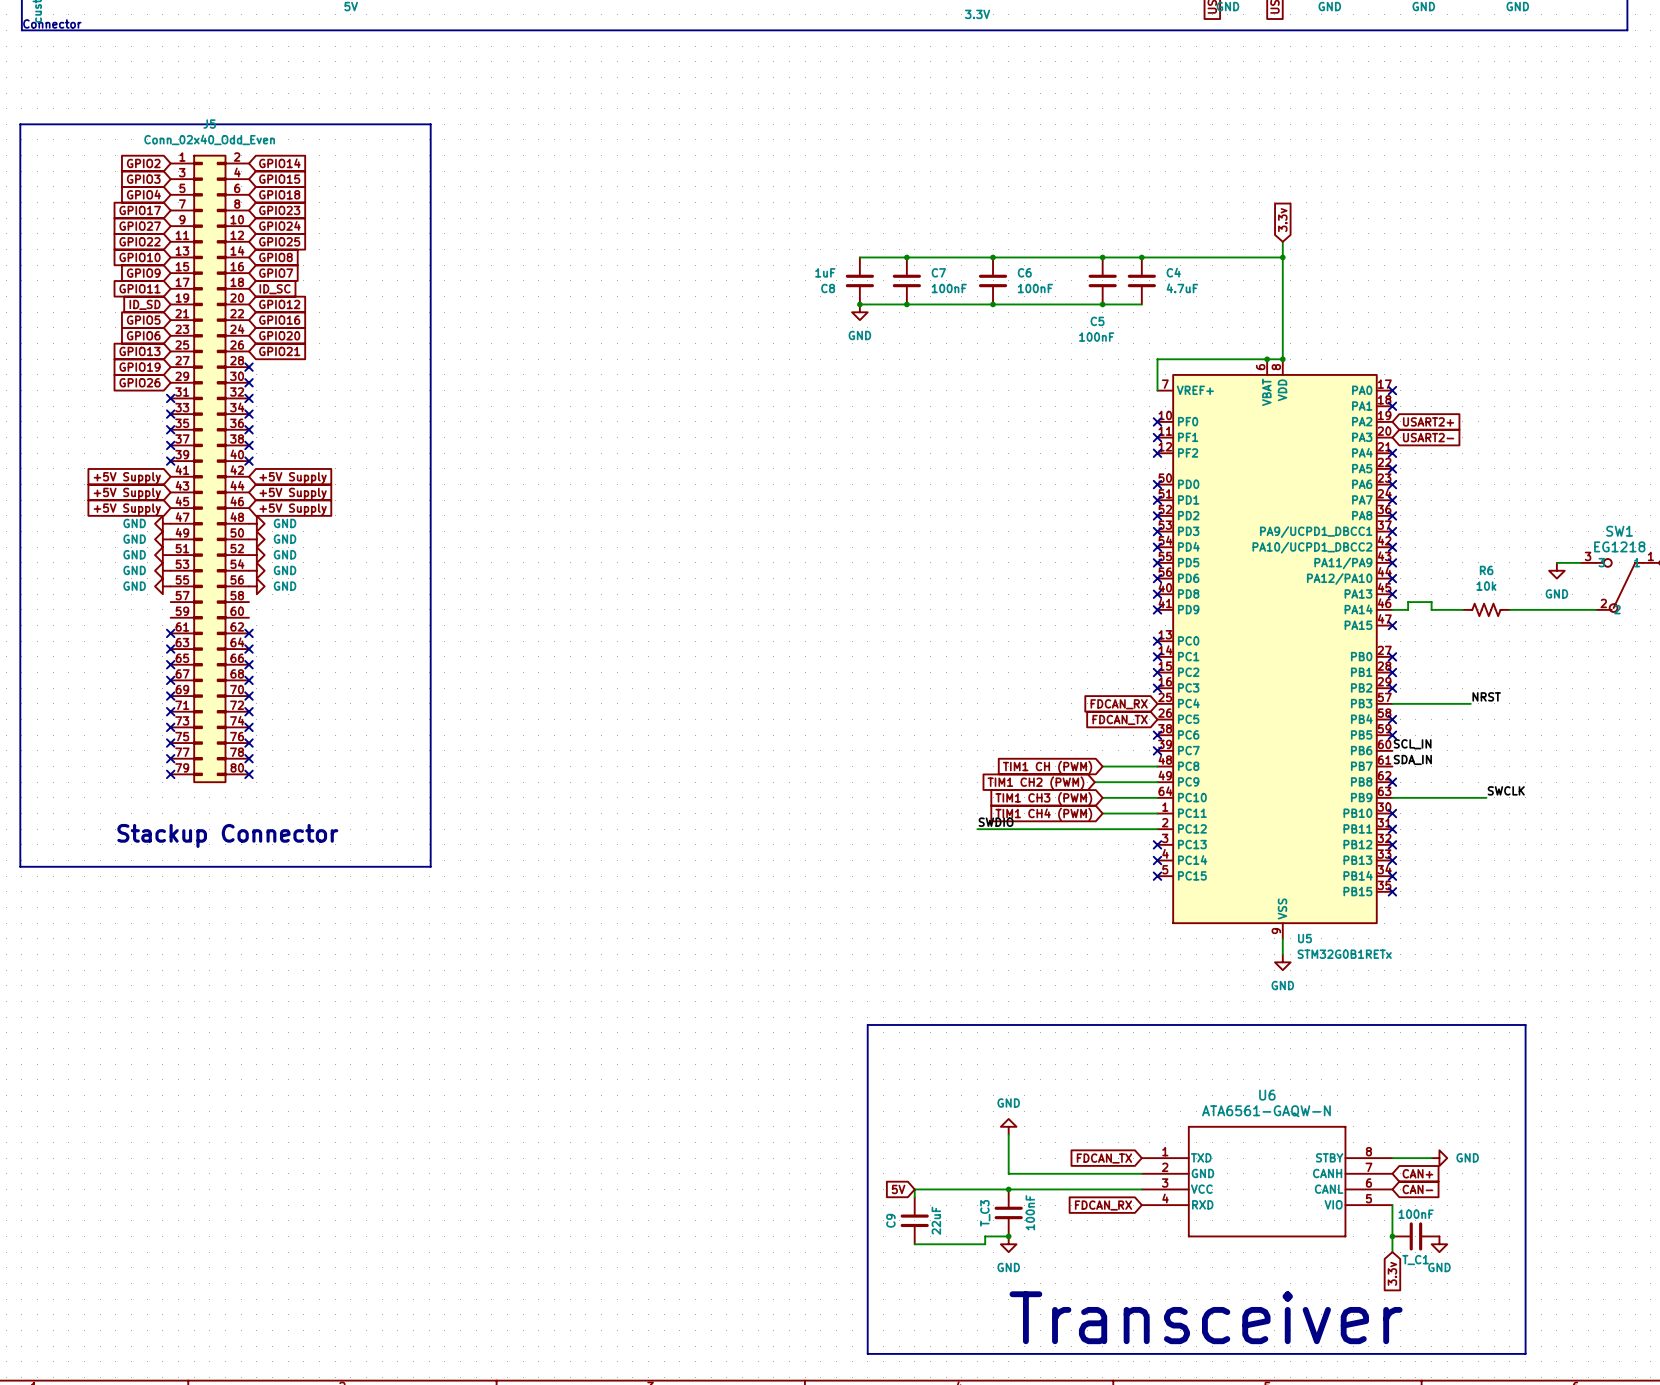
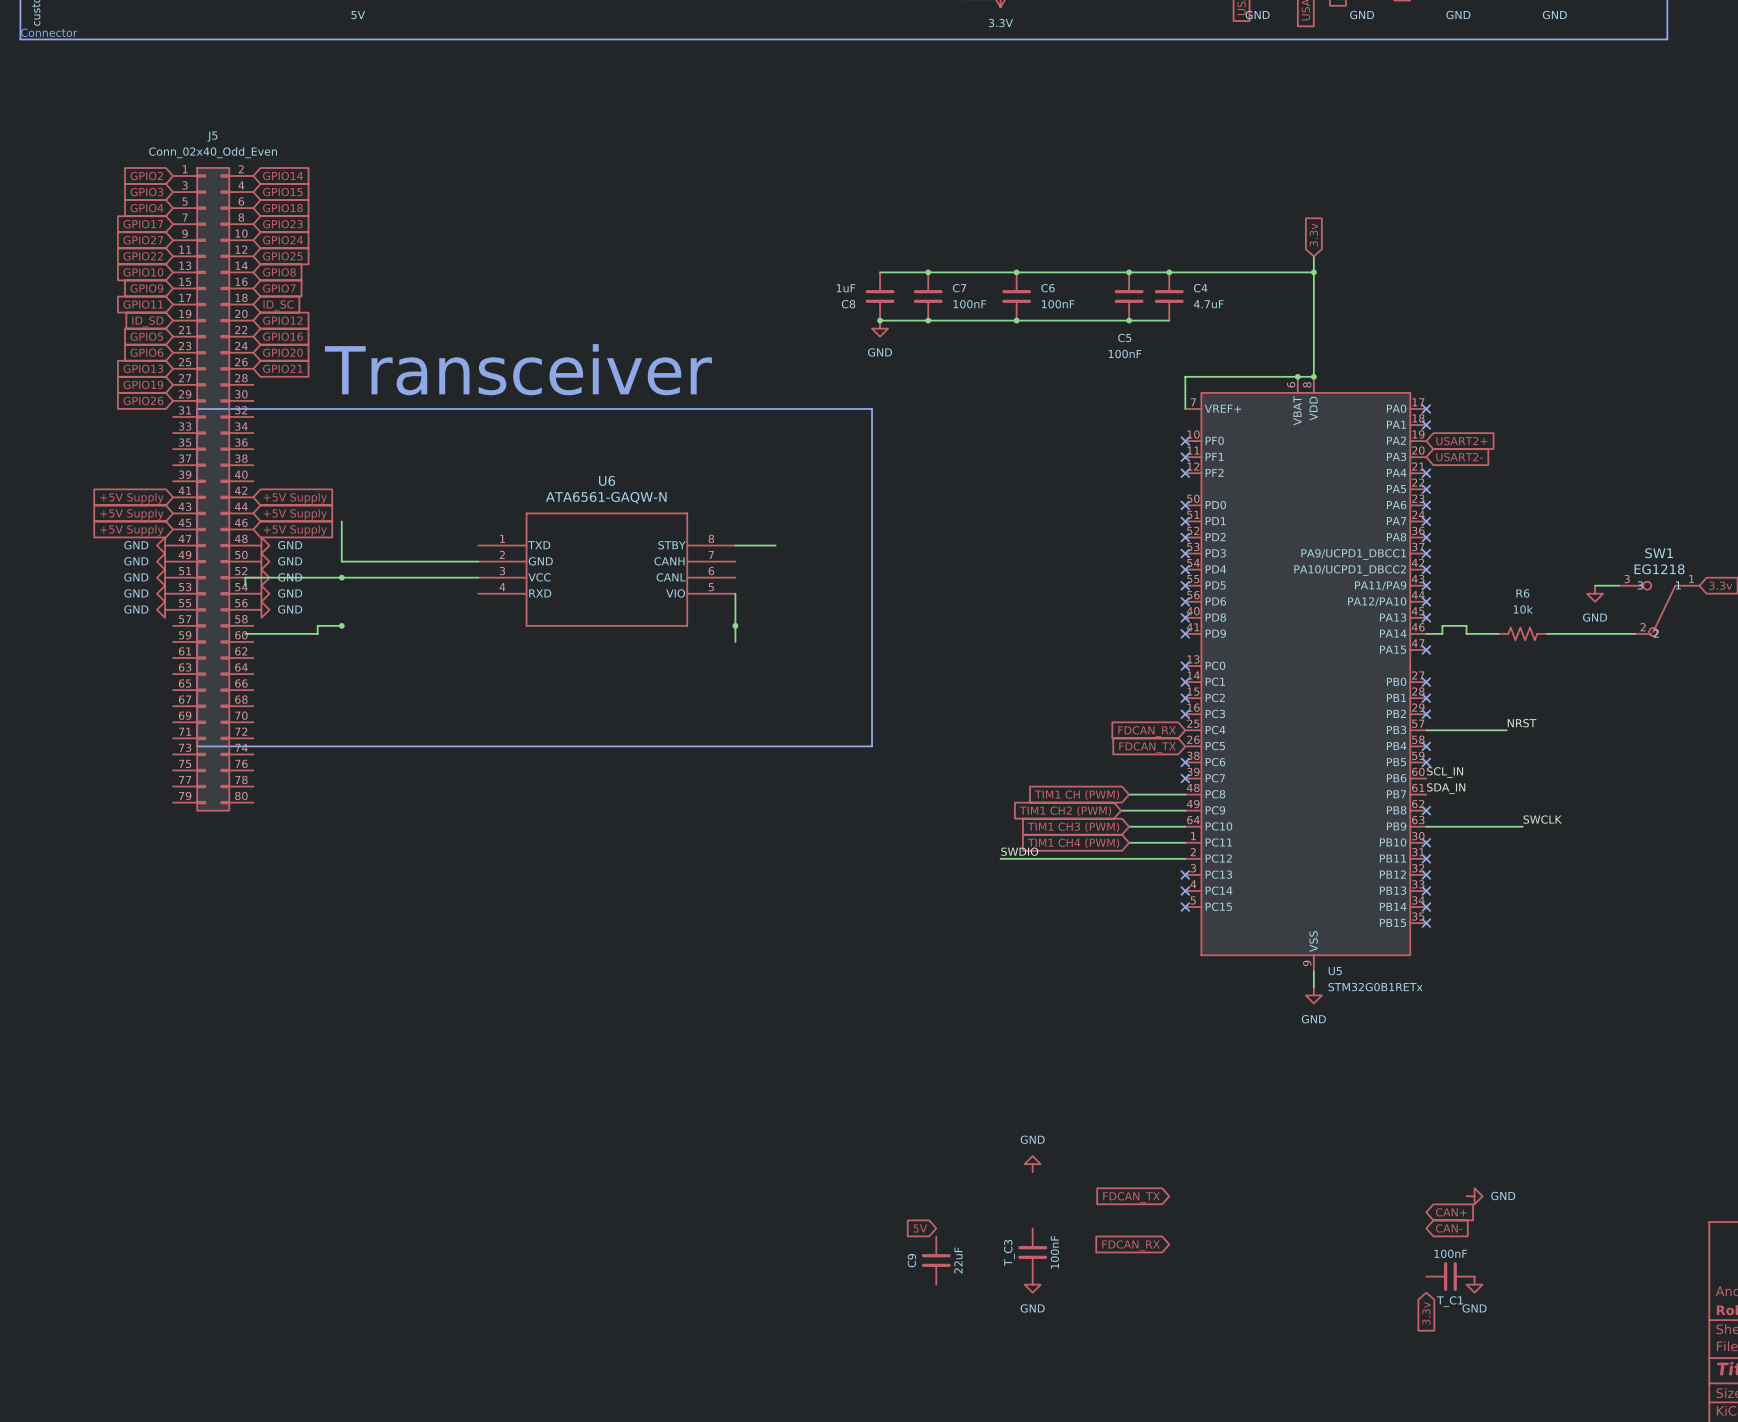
line: (20, 124) (430, 124) (430, 866) (20, 866) (20, 124) -> none
text: none -> Transceiver (518, 369)
no-connect mark: (249, 367) -> none
no-connect mark: (249, 382) -> none
line: none -> (197, 408) (872, 408) (872, 746) (197, 746) (197, 408)
no-connect mark: (170, 398) -> none
no-connect mark: (249, 398) -> none
no-connect mark: (170, 414) -> none
no-connect mark: (249, 414) -> none
no-connect mark: (170, 429) -> none
no-connect mark: (249, 429) -> none
no-connect mark: (170, 445) -> none
no-connect mark: (249, 445) -> none
no-connect mark: (170, 461) -> none
no-connect mark: (249, 461) -> none
wire: none -> (341, 521) (341, 561) (478, 561)
wire: none -> (735, 545) (775, 545)
junction: none -> (341, 577)
wire: none -> (478, 577) (245, 577) (245, 585)
wire: none -> (735, 593) (735, 641)
wire: none -> (341, 625) (317, 625) (317, 633) (245, 633)
junction: none -> (341, 625)
junction: none -> (735, 625)
no-connect mark: (170, 633) -> none
no-connect mark: (249, 633) -> none
no-connect mark: (170, 649) -> none
no-connect mark: (249, 649) -> none
no-connect mark: (170, 664) -> none
no-connect mark: (249, 664) -> none
no-connect mark: (170, 680) -> none
no-connect mark: (249, 680) -> none
no-connect mark: (170, 696) -> none
no-connect mark: (249, 696) -> none
no-connect mark: (170, 711) -> none
no-connect mark: (249, 711) -> none
no-connect mark: (170, 727) -> none
no-connect mark: (249, 727) -> none
no-connect mark: (170, 743) -> none
no-connect mark: (249, 743) -> none
no-connect mark: (170, 758) -> none
no-connect mark: (249, 758) -> none
no-connect mark: (170, 774) -> none
no-connect mark: (249, 774) -> none
text: Stackup Connector (227, 835) -> none
line: (867, 1024) (1525, 1024) (1525, 1353) (867, 1353) (867, 1024) -> none
wire: (1008, 1134) (1008, 1173) (1141, 1173) -> none
wire: (1392, 1158) (1431, 1158) -> none
U6 position: (1267, 1181) -> (606, 569)
junction: (1008, 1189) -> none
wire: (1141, 1189) (914, 1189) (914, 1197) -> none
wire: (1392, 1205) (1392, 1252) -> none
wire: (1008, 1236) (985, 1236) (985, 1244) (914, 1244) -> none
junction: (1008, 1236) -> none
junction: (1392, 1236) -> none
text: Transceiver (1206, 1317) -> none

